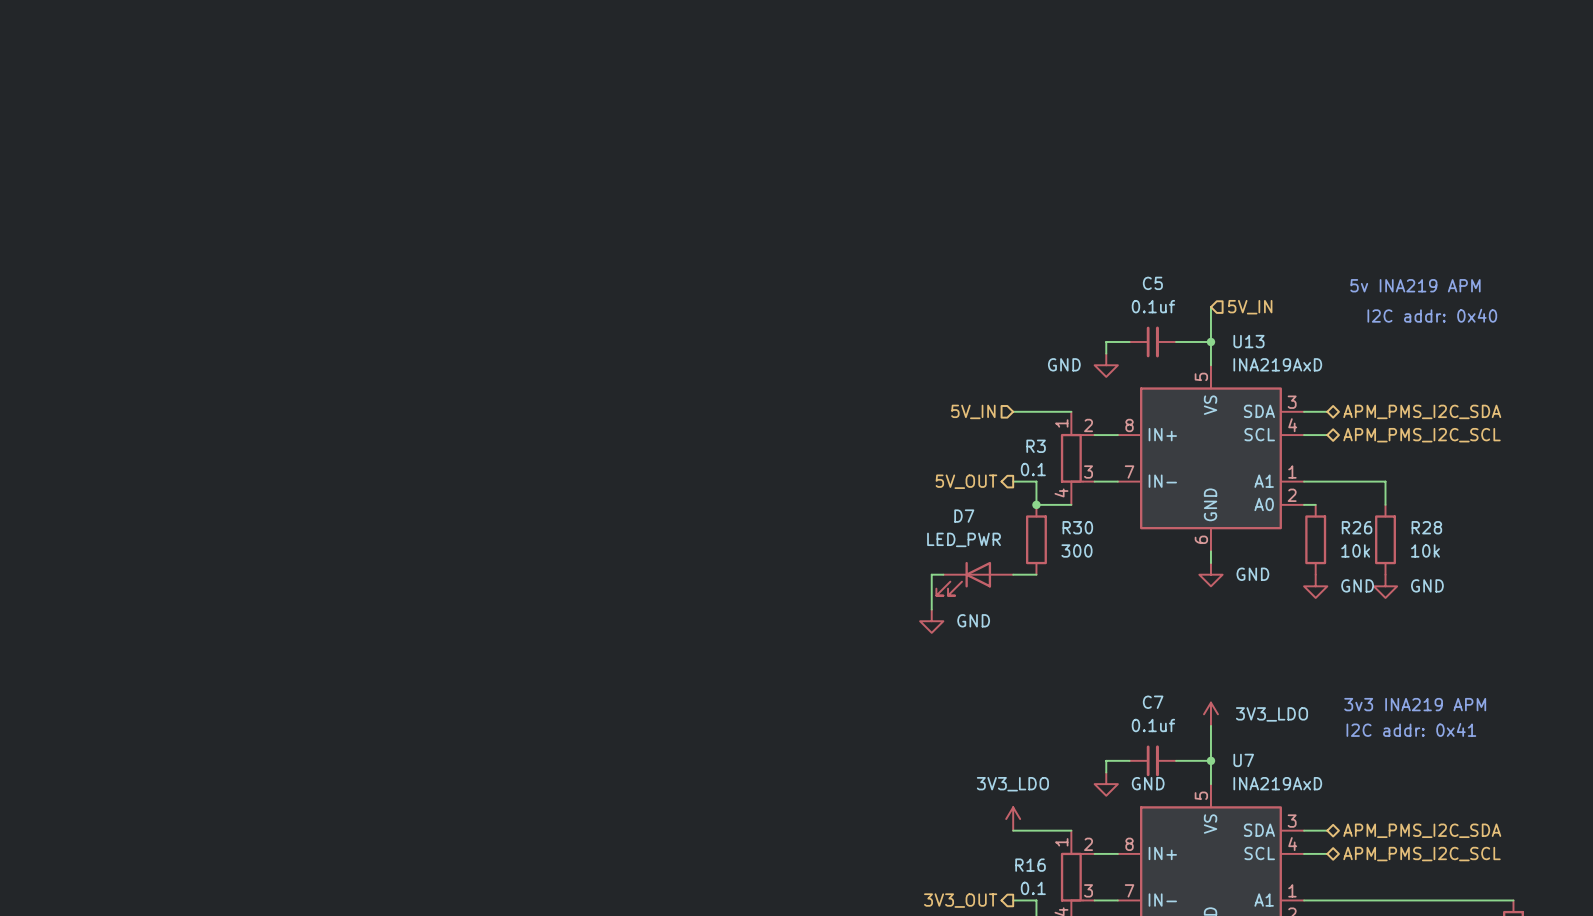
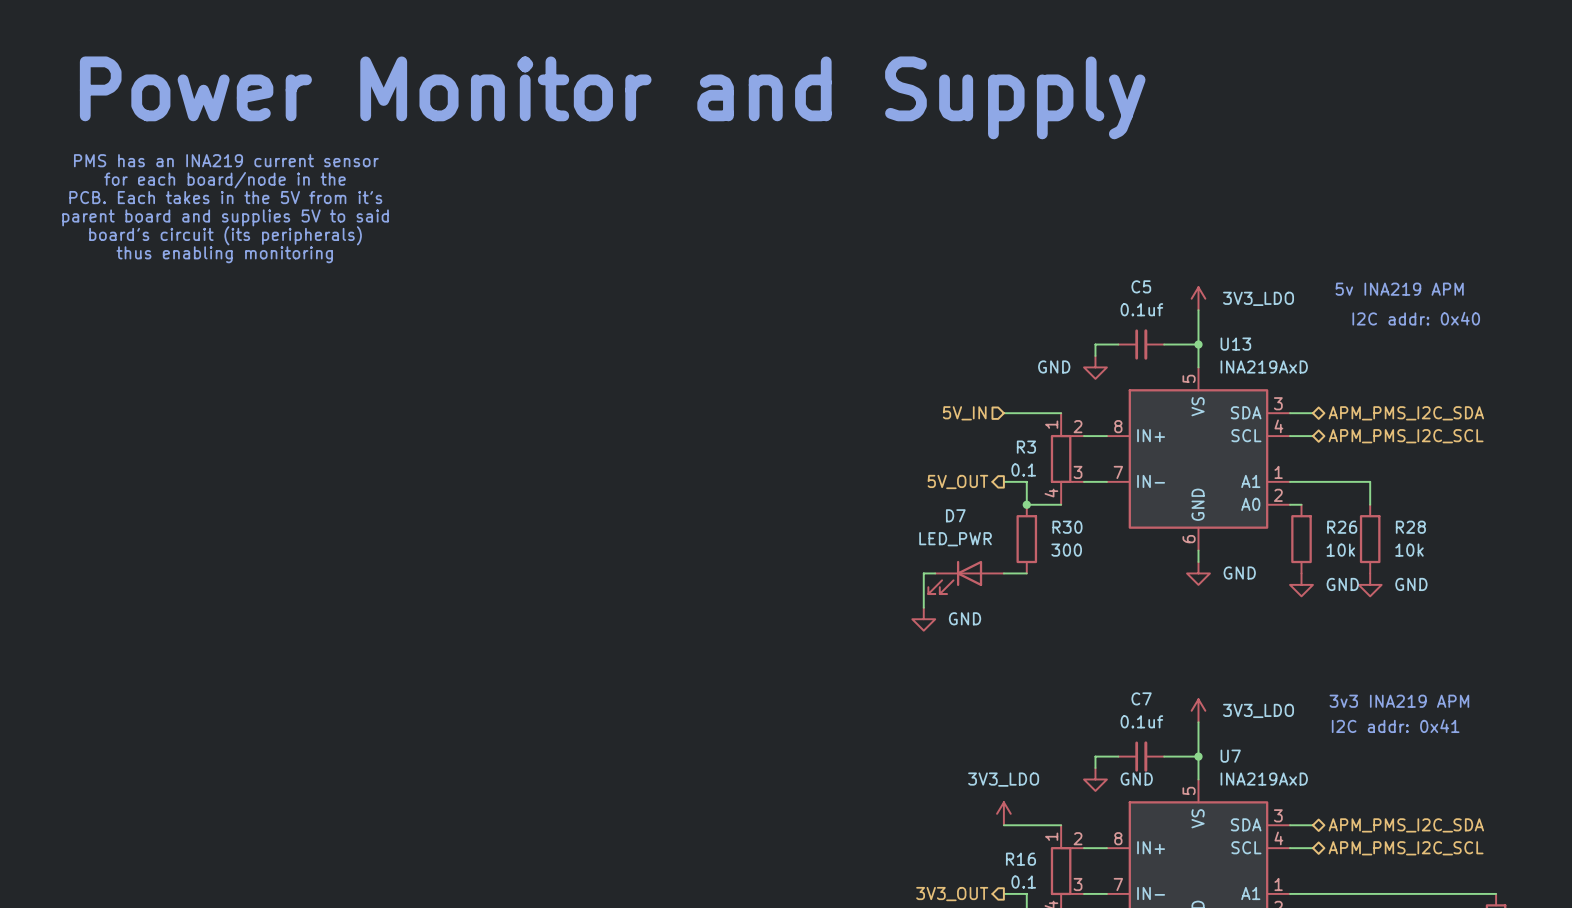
text: none -> Power Monitor and Supply (612, 97)
text: none -> PMS has an INA219 current sensor (226, 160)
text: none -> for each board/node in the (225, 180)
text: none -> PCB. Each takes in the 5V from it's (225, 197)
text: none -> parent board and supplies 5V to said (225, 217)
text: none -> board's circuit (its peripherals) (225, 235)
text: none -> thus enabling monitoring (224, 254)
power symbol: none -> 3V3_LDO (1198, 298)
hierarchical label: 5V_IN (1250, 307) -> none

